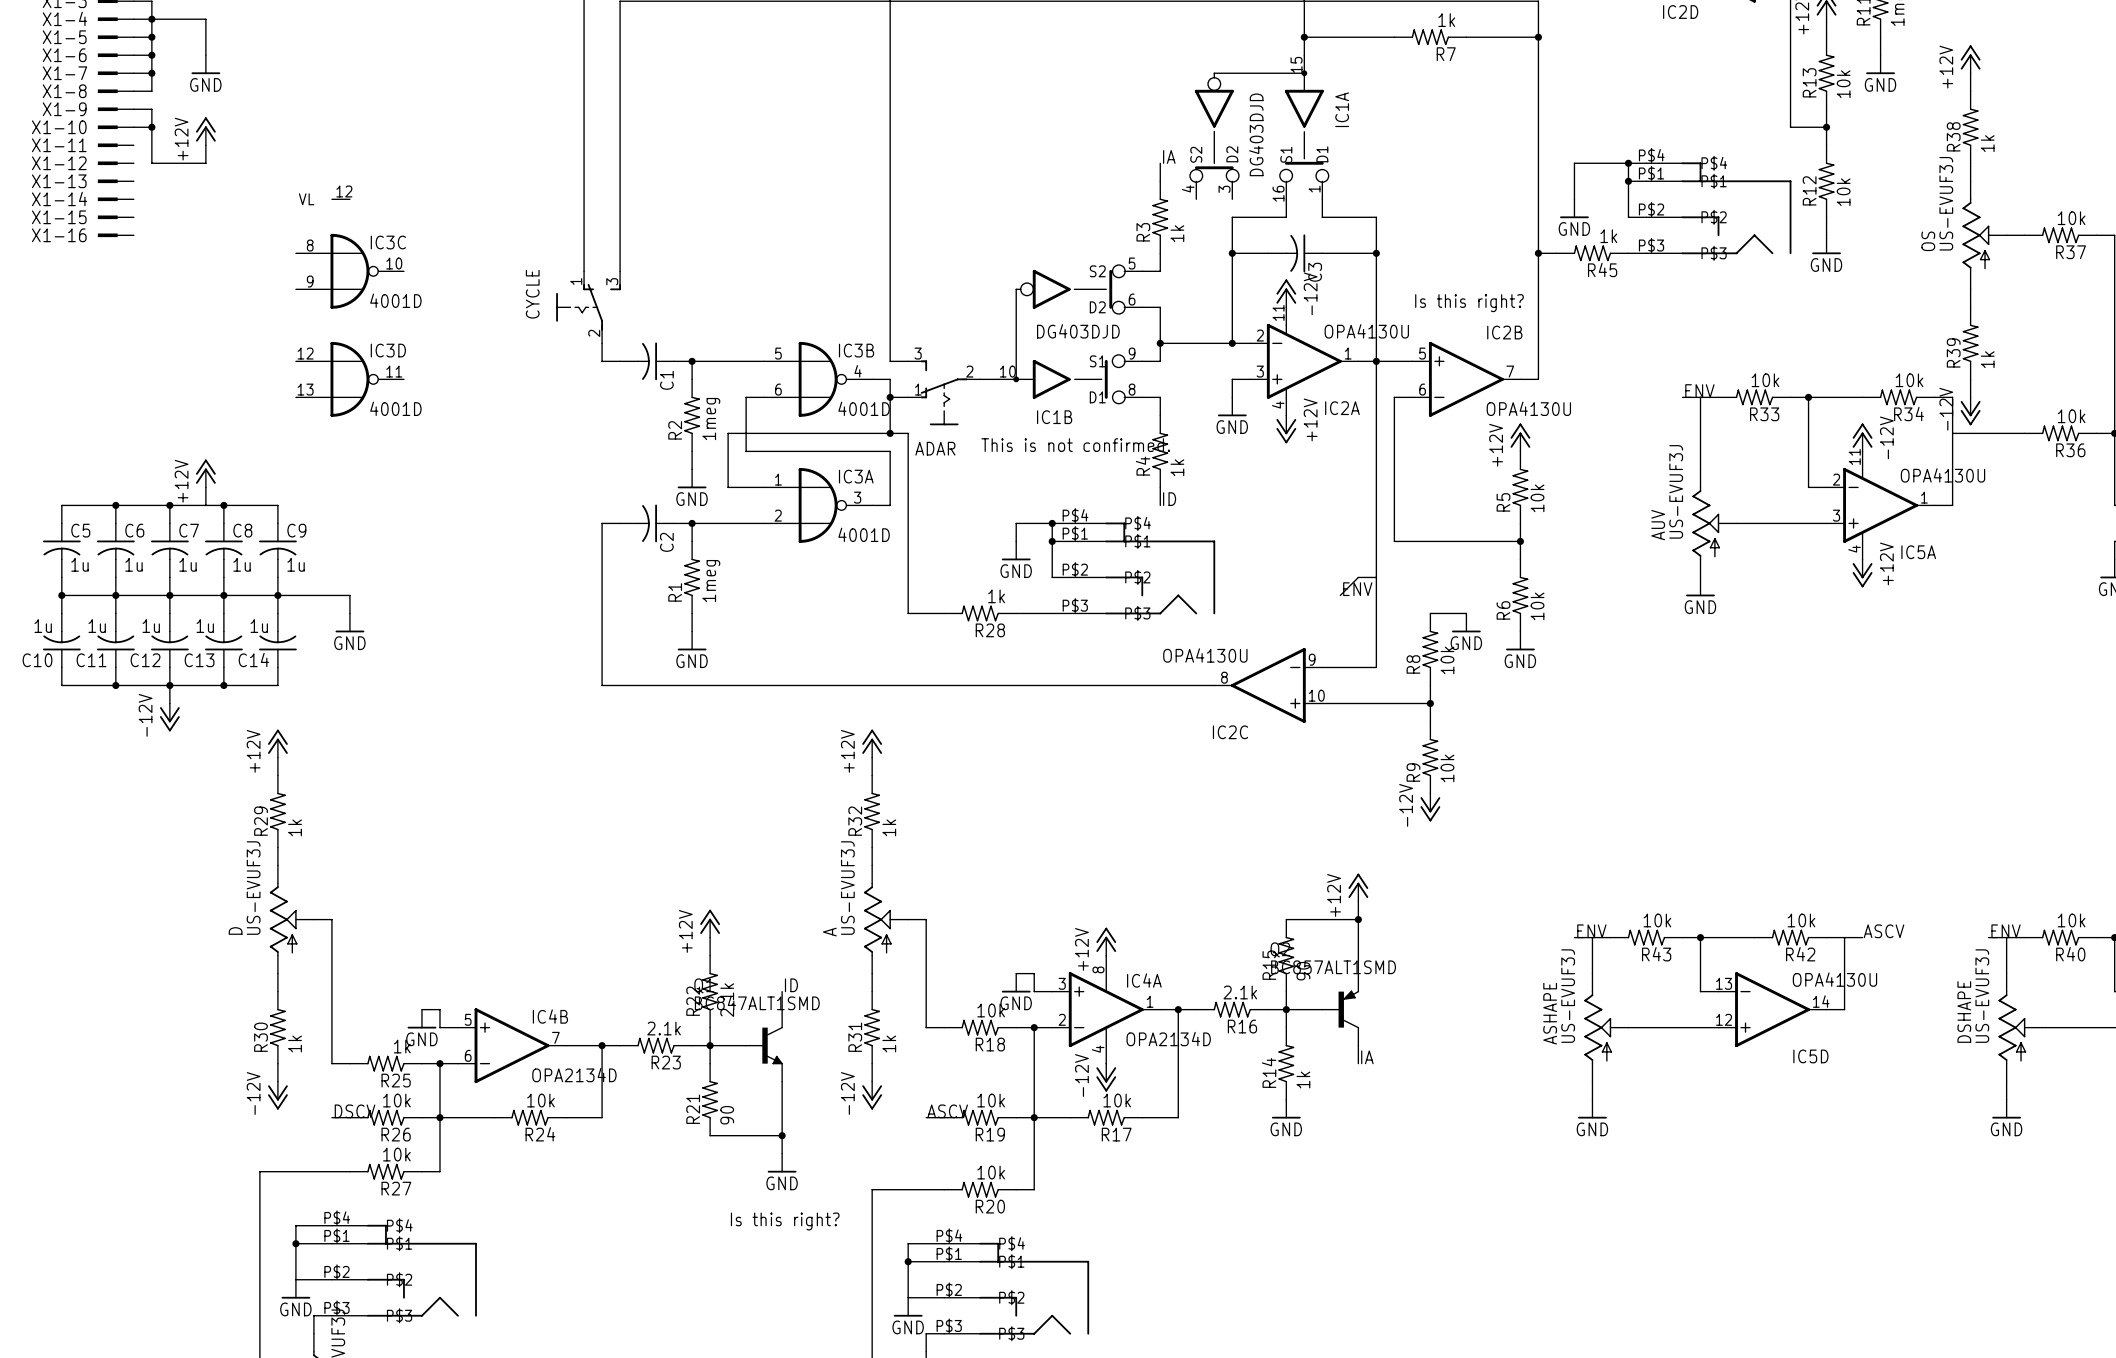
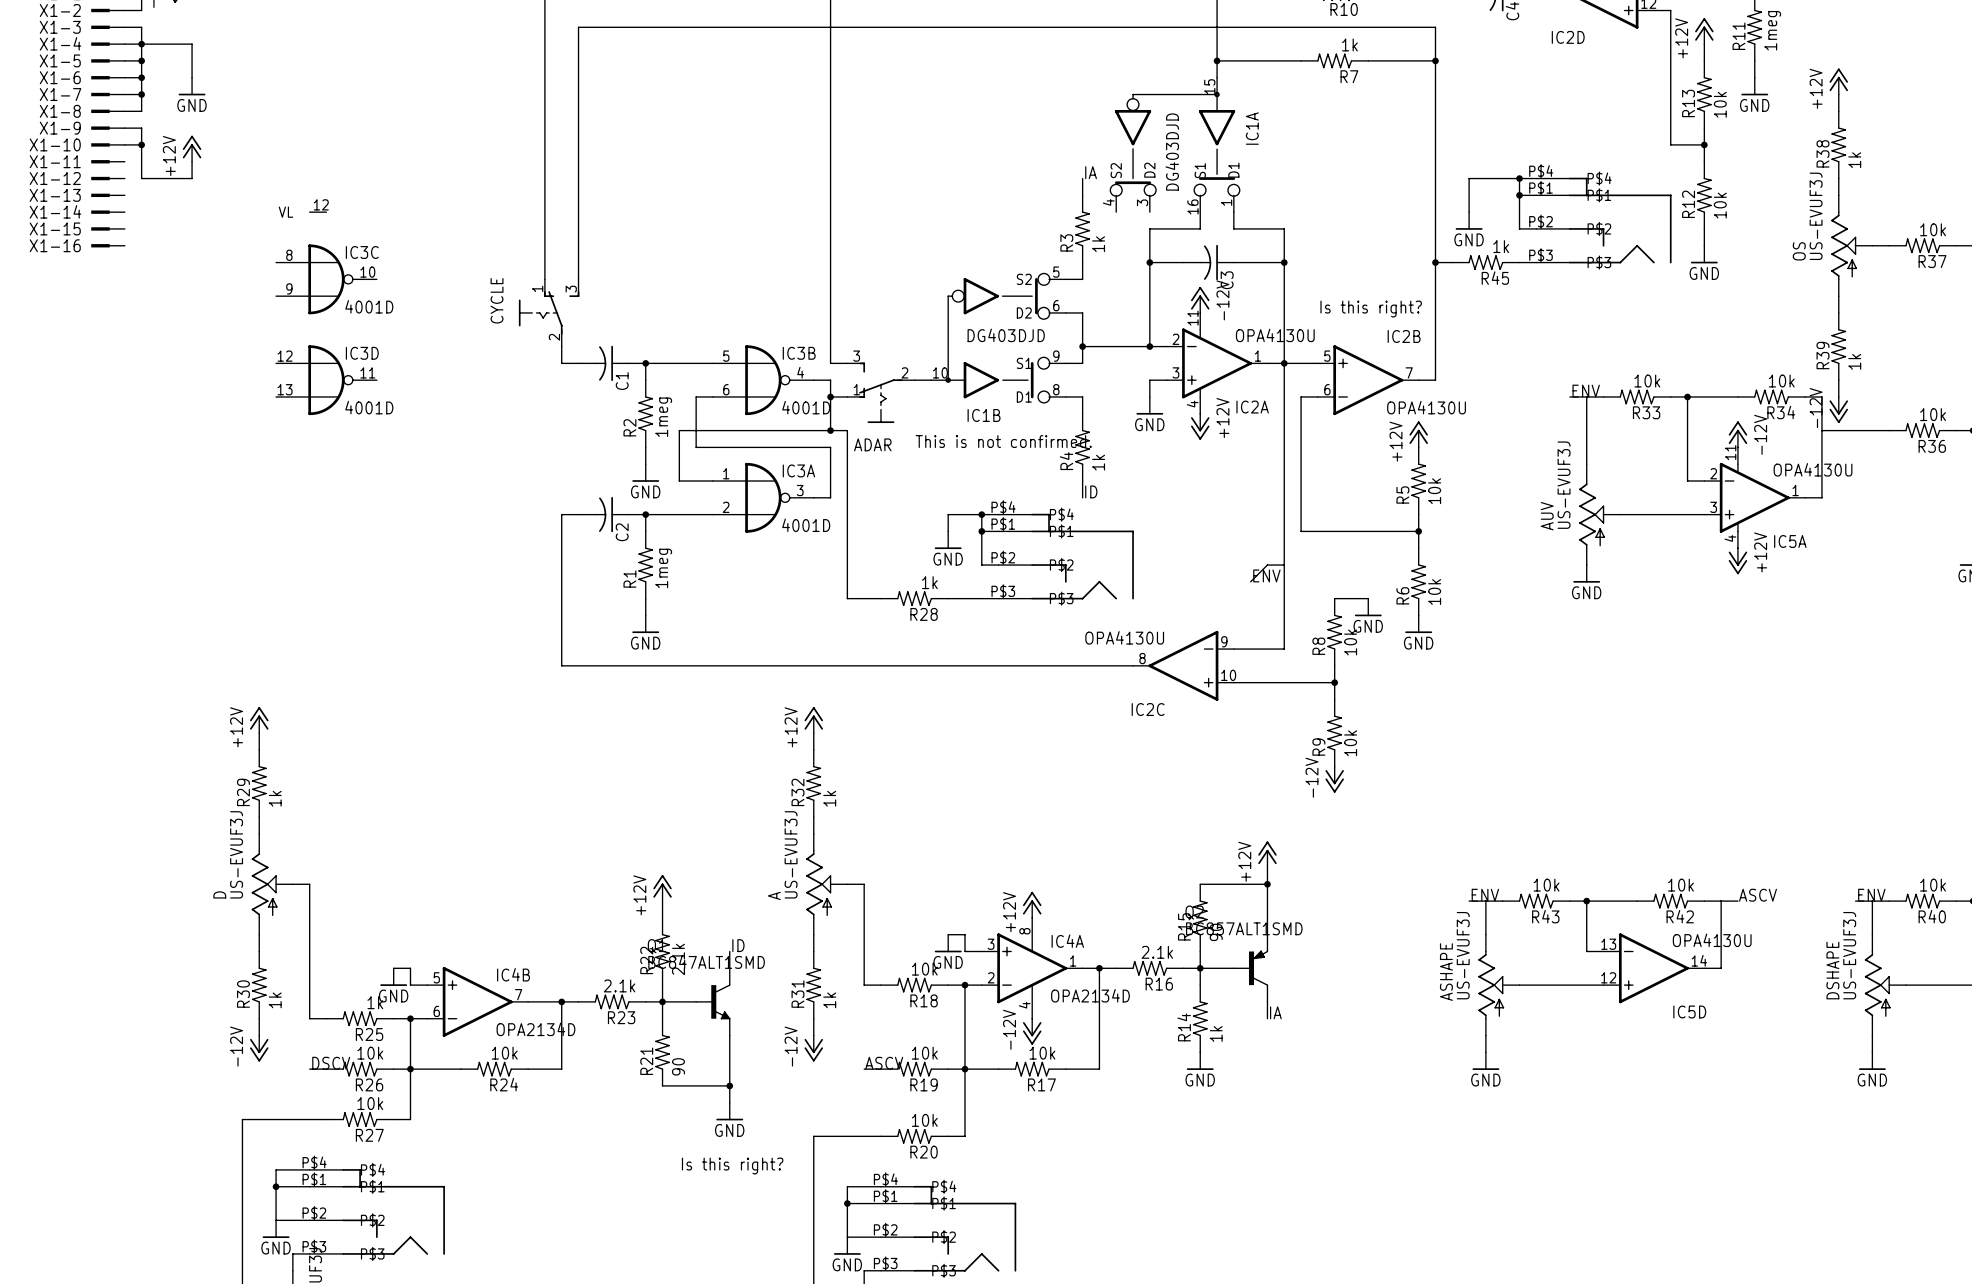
power symbol: +12V (205, 473) -> none
wire: (205, 487) (205, 505) -> none
wire: (115, 505) (115, 523) -> none
junction: (115, 505) -> none
wire: (169, 505) (169, 523) -> none
junction: (169, 505) -> none
wire: (223, 505) (223, 523) -> none
junction: (223, 505) -> none
wire: (61, 523) (61, 505) (277, 505) (277, 523) -> none
C5: 1u (61, 550) -> none
C6: 1u (115, 550) -> none
C7: 1u (169, 550) -> none
C8: 1u (223, 550) -> none
C9: 1u (277, 550) -> none
wire: (61, 577) (61, 613) -> none
wire: (115, 577) (115, 613) -> none
wire: (169, 577) (169, 613) -> none
wire: (223, 577) (223, 613) -> none
wire: (277, 577) (277, 613) -> none
wire: (61, 595) (349, 595) (349, 613) -> none
junction: (61, 595) -> none
junction: (115, 595) -> none
junction: (169, 595) -> none
junction: (223, 595) -> none
junction: (277, 595) -> none
power symbol: GND (349, 622) -> none
C10: 1u (61, 640) -> none
C11: 1u (115, 640) -> none
C12: 1u (169, 640) -> none
C13: 1u (223, 640) -> none
C14: 1u (277, 640) -> none
wire: (61, 667) (61, 685) (277, 685) (277, 667) -> none
wire: (115, 667) (115, 685) -> none
wire: (169, 667) (169, 703) -> none
wire: (223, 667) (223, 685) -> none
junction: (115, 685) -> none
junction: (169, 685) -> none
junction: (223, 685) -> none
power symbol: -12V (169, 717) -> none

